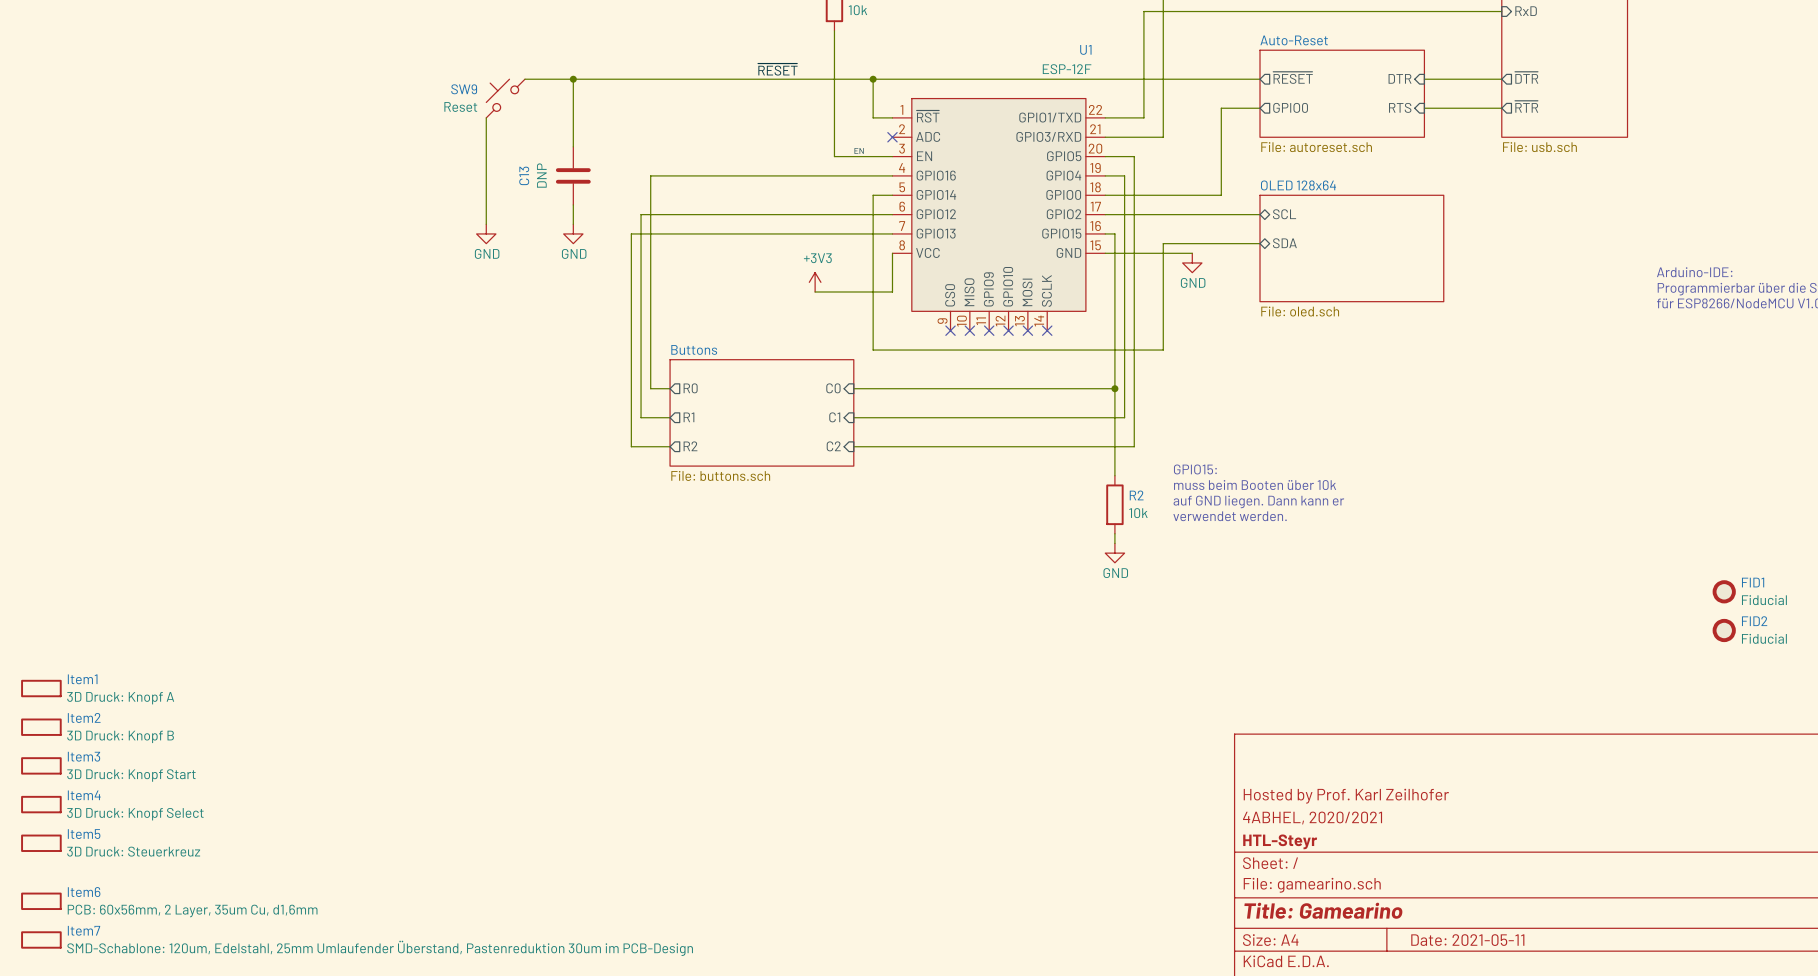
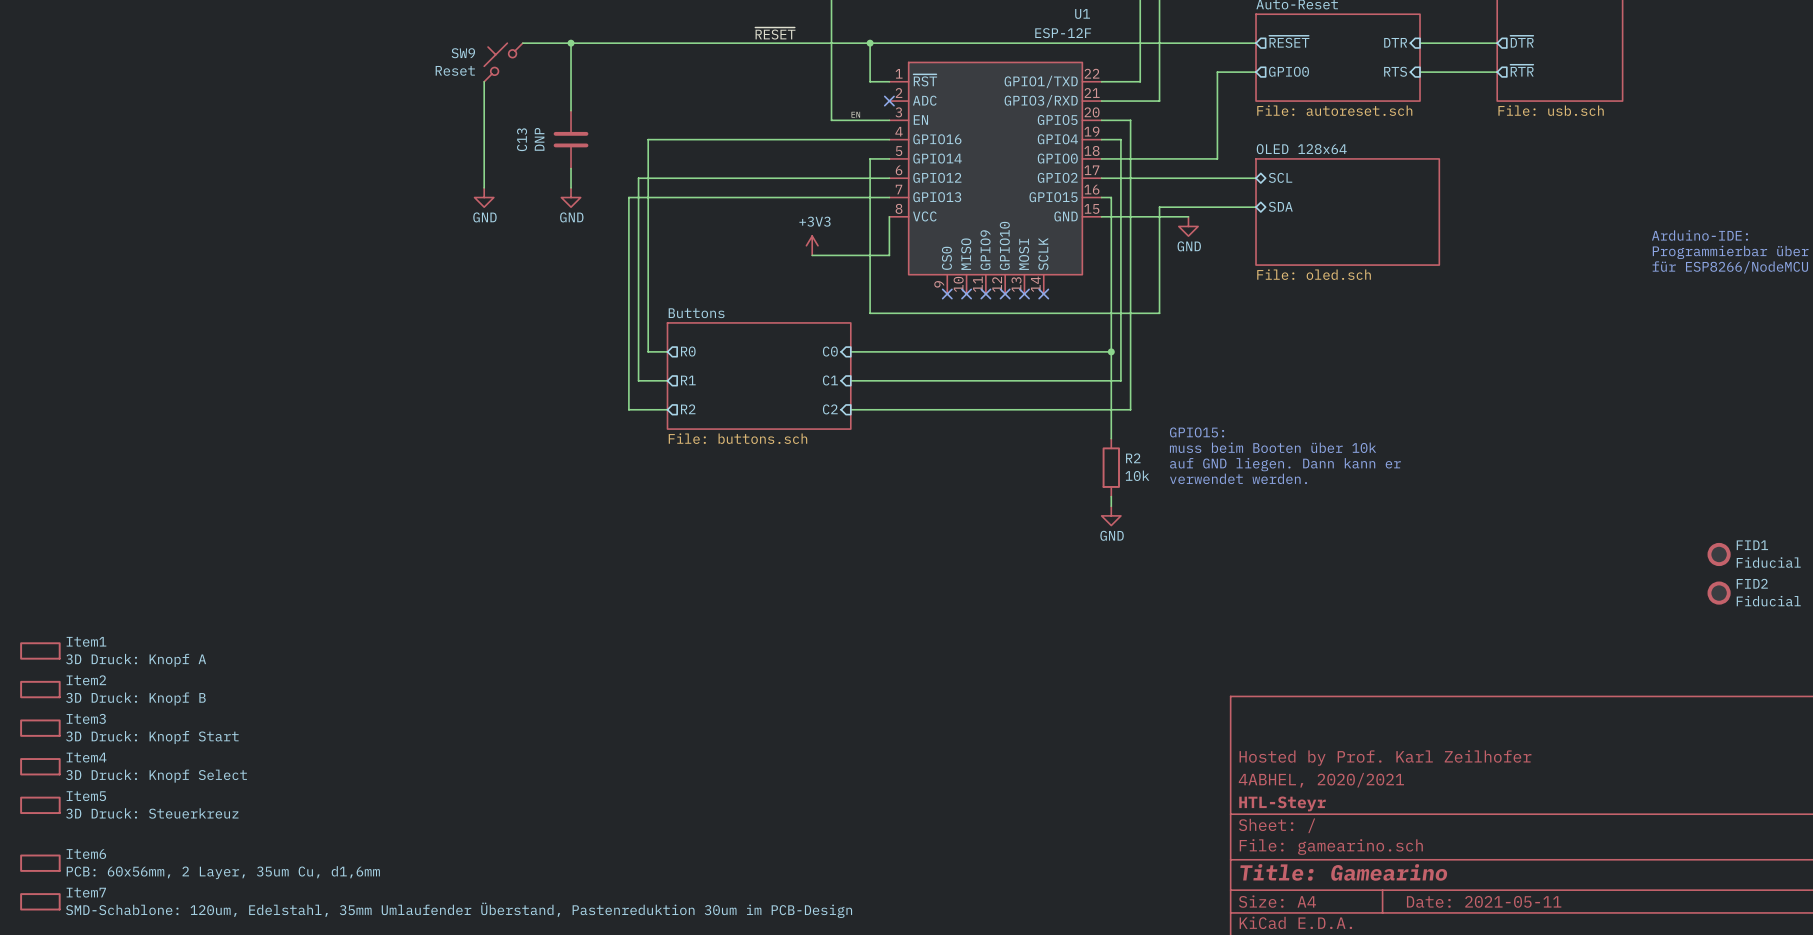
Item7 value: SMD-Schablone: 120um, Edelstahl, 25mm Umlaufender Überstand, Pastenreduktion 30um im PCB-Design (380, 948) -> SMD-Schablone: 120um, Edelstahl, 35mm Umlaufender Überstand, Pastenreduktion 30um im PCB-Design (459, 910)

